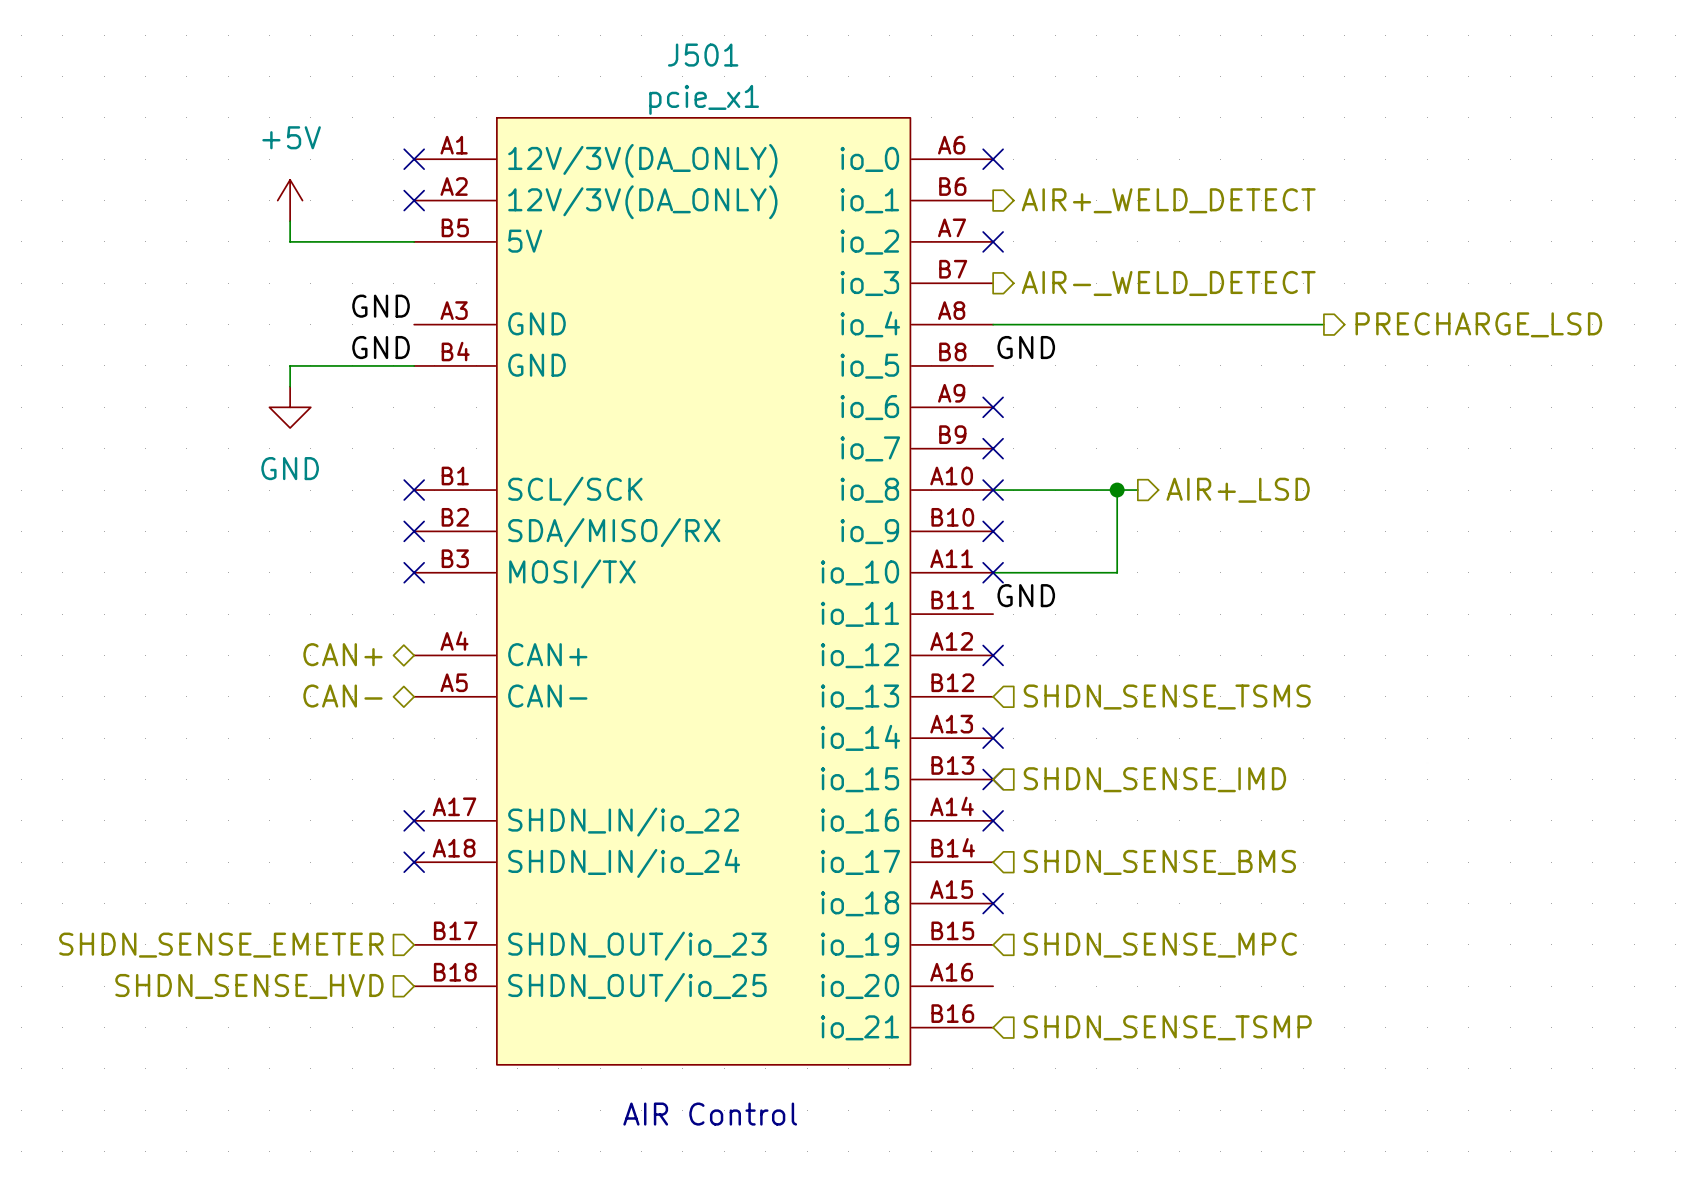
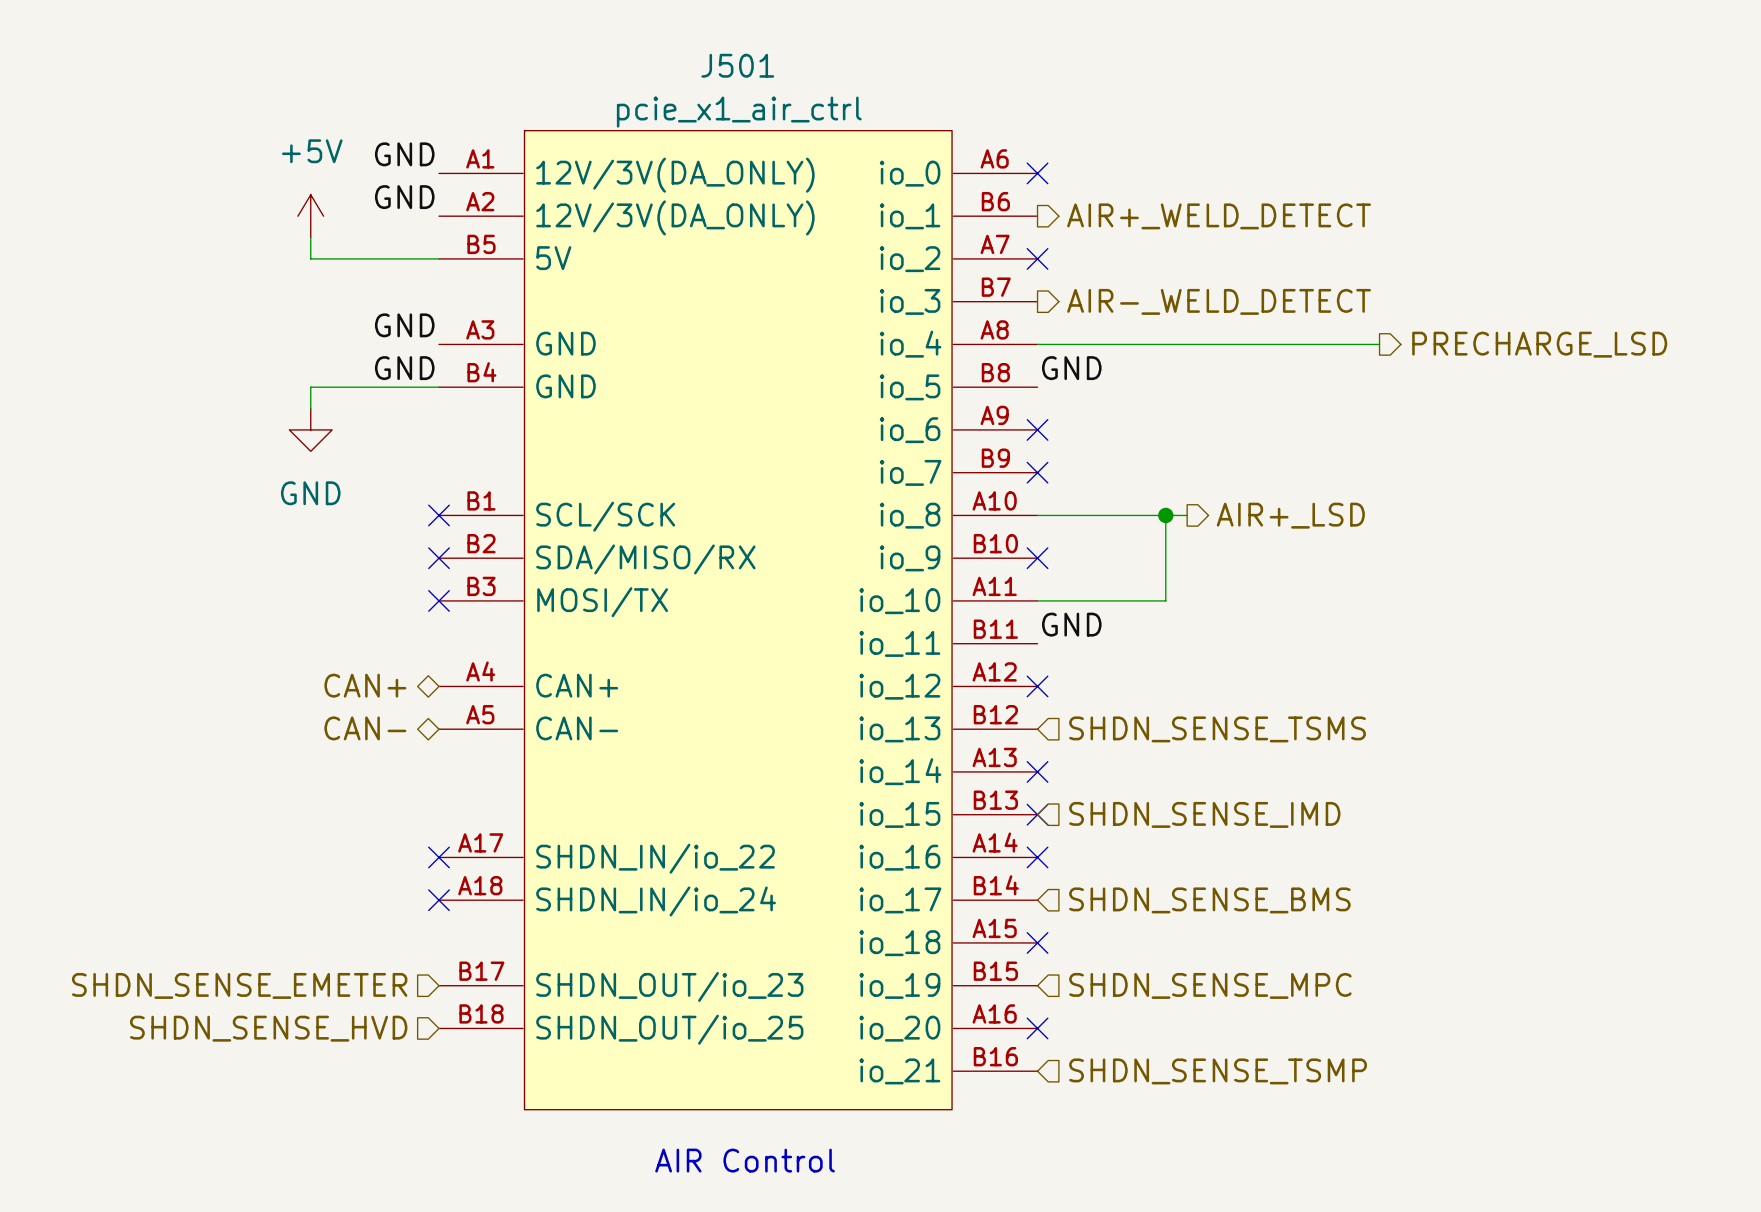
J501 value: pcie_x1 (704, 99) -> pcie_x1_air_ctrl (739, 112)
label: none -> GND (404, 154)
no-connect mark: (414, 159) -> none
label: none -> GND (404, 197)
no-connect mark: (414, 200) -> none
no-connect mark: (993, 490) -> none
no-connect mark: (993, 572) -> none
no-connect mark: none -> (1037, 1028)

